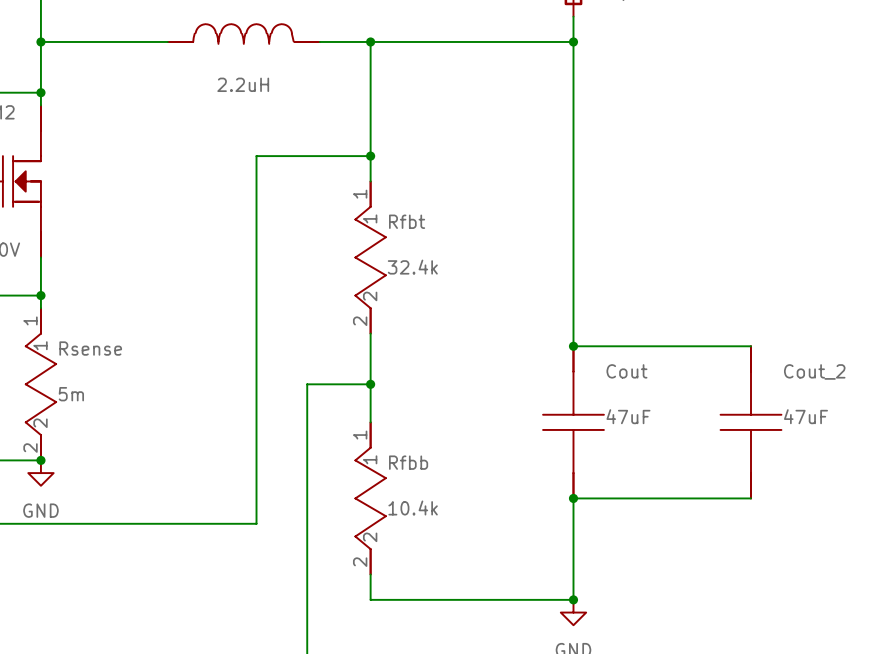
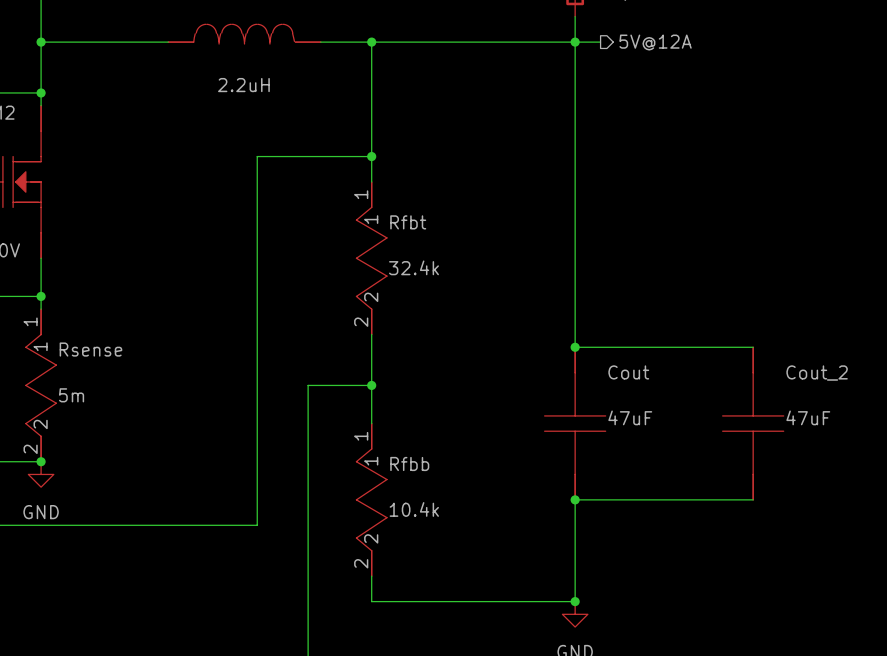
wire: none -> (575, 42) (600, 42)
hierarchical label: none -> 5V@12A (655, 42)

